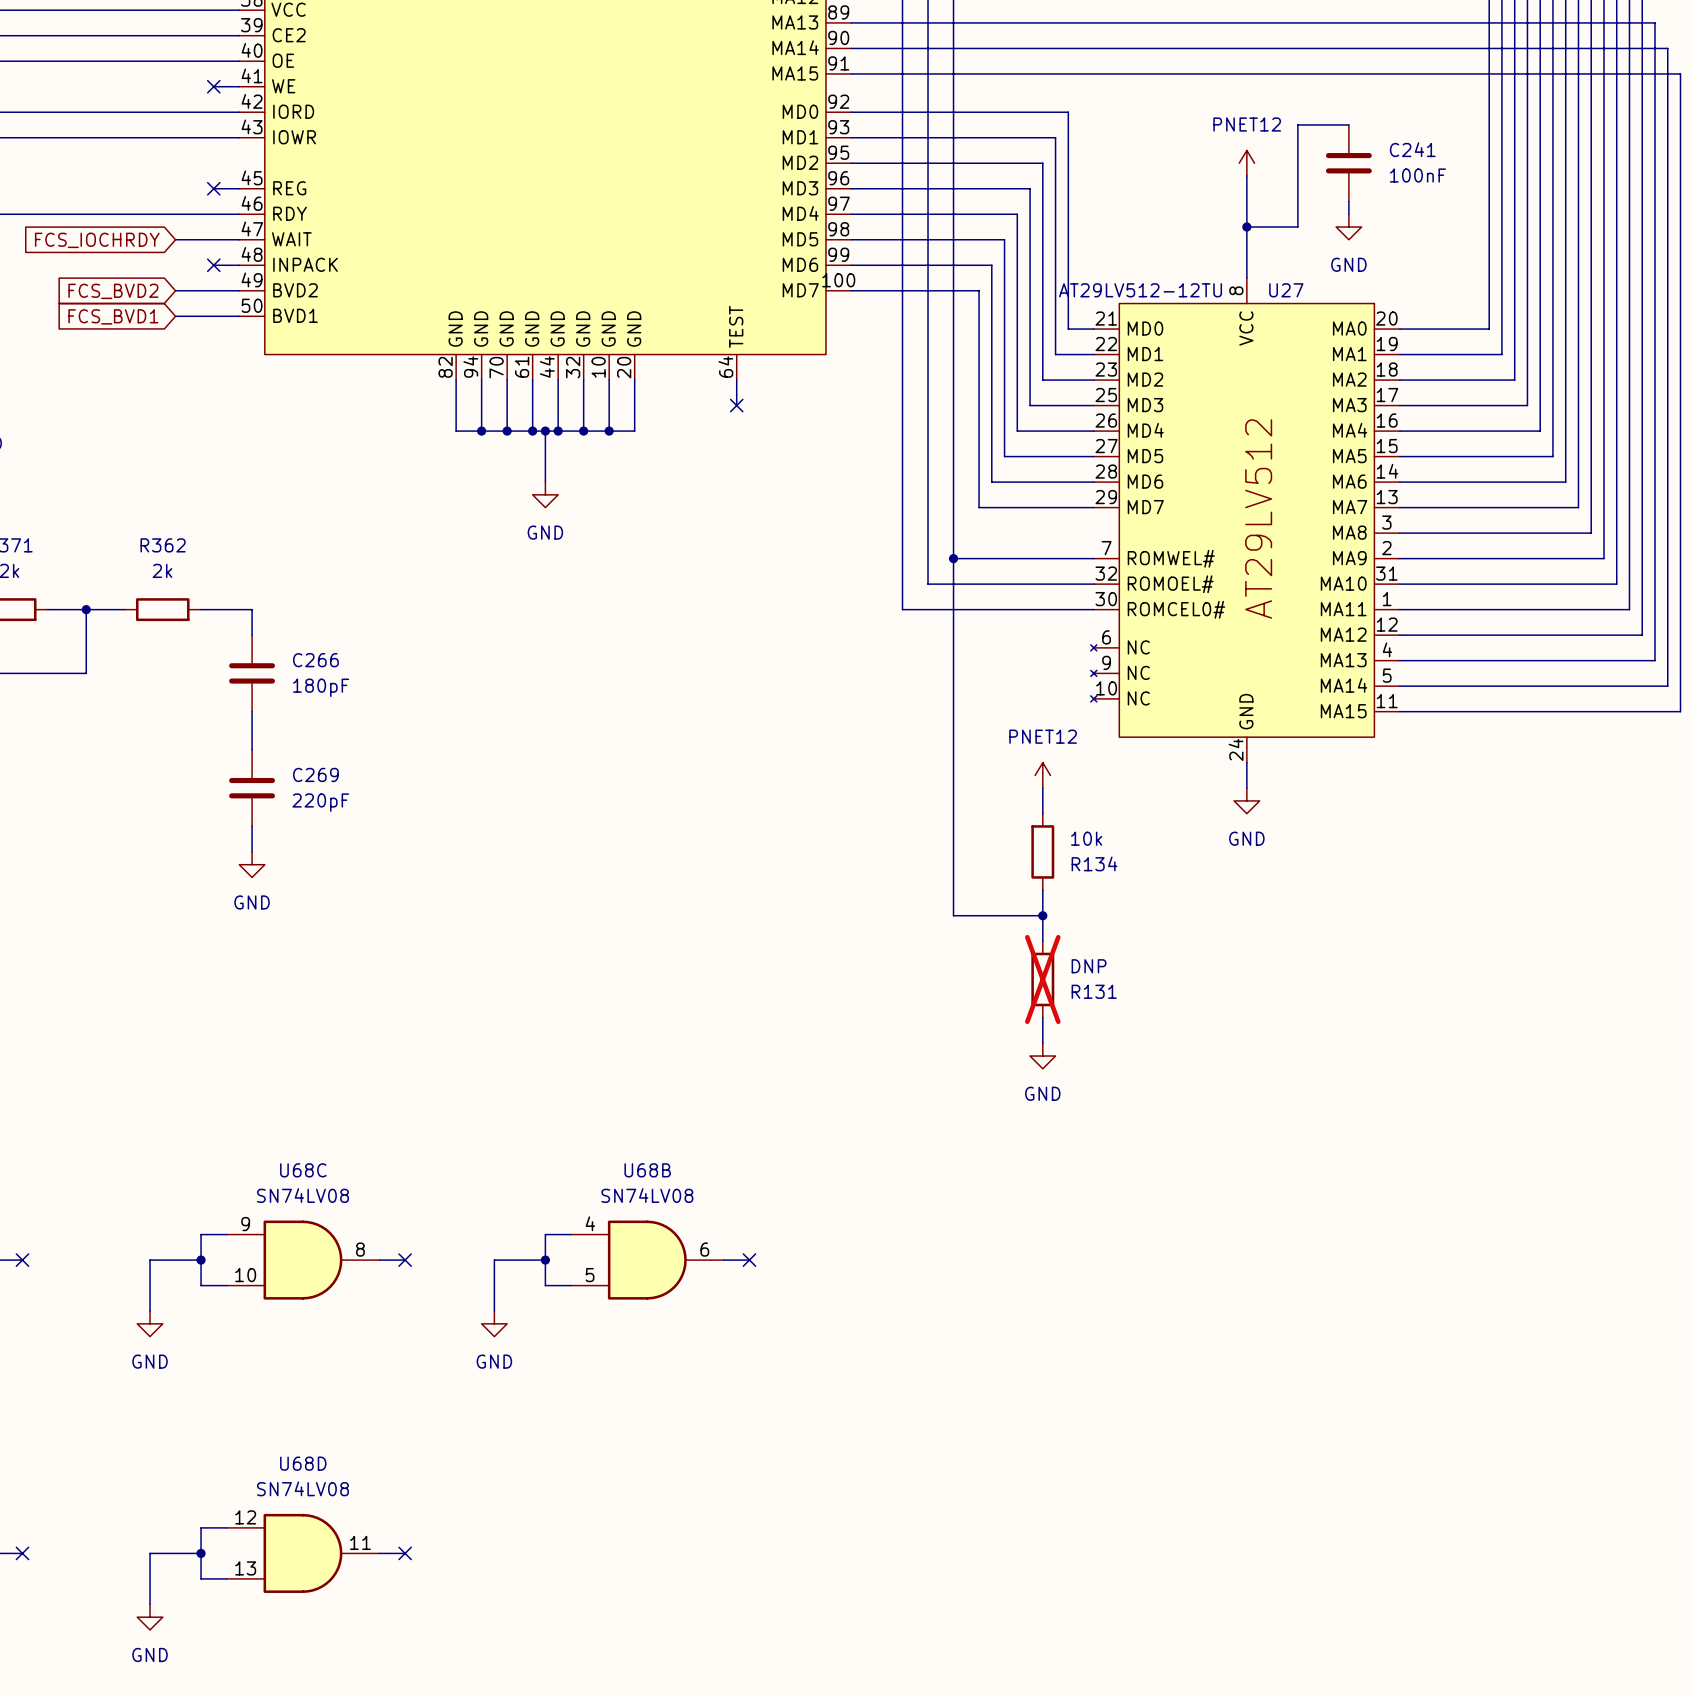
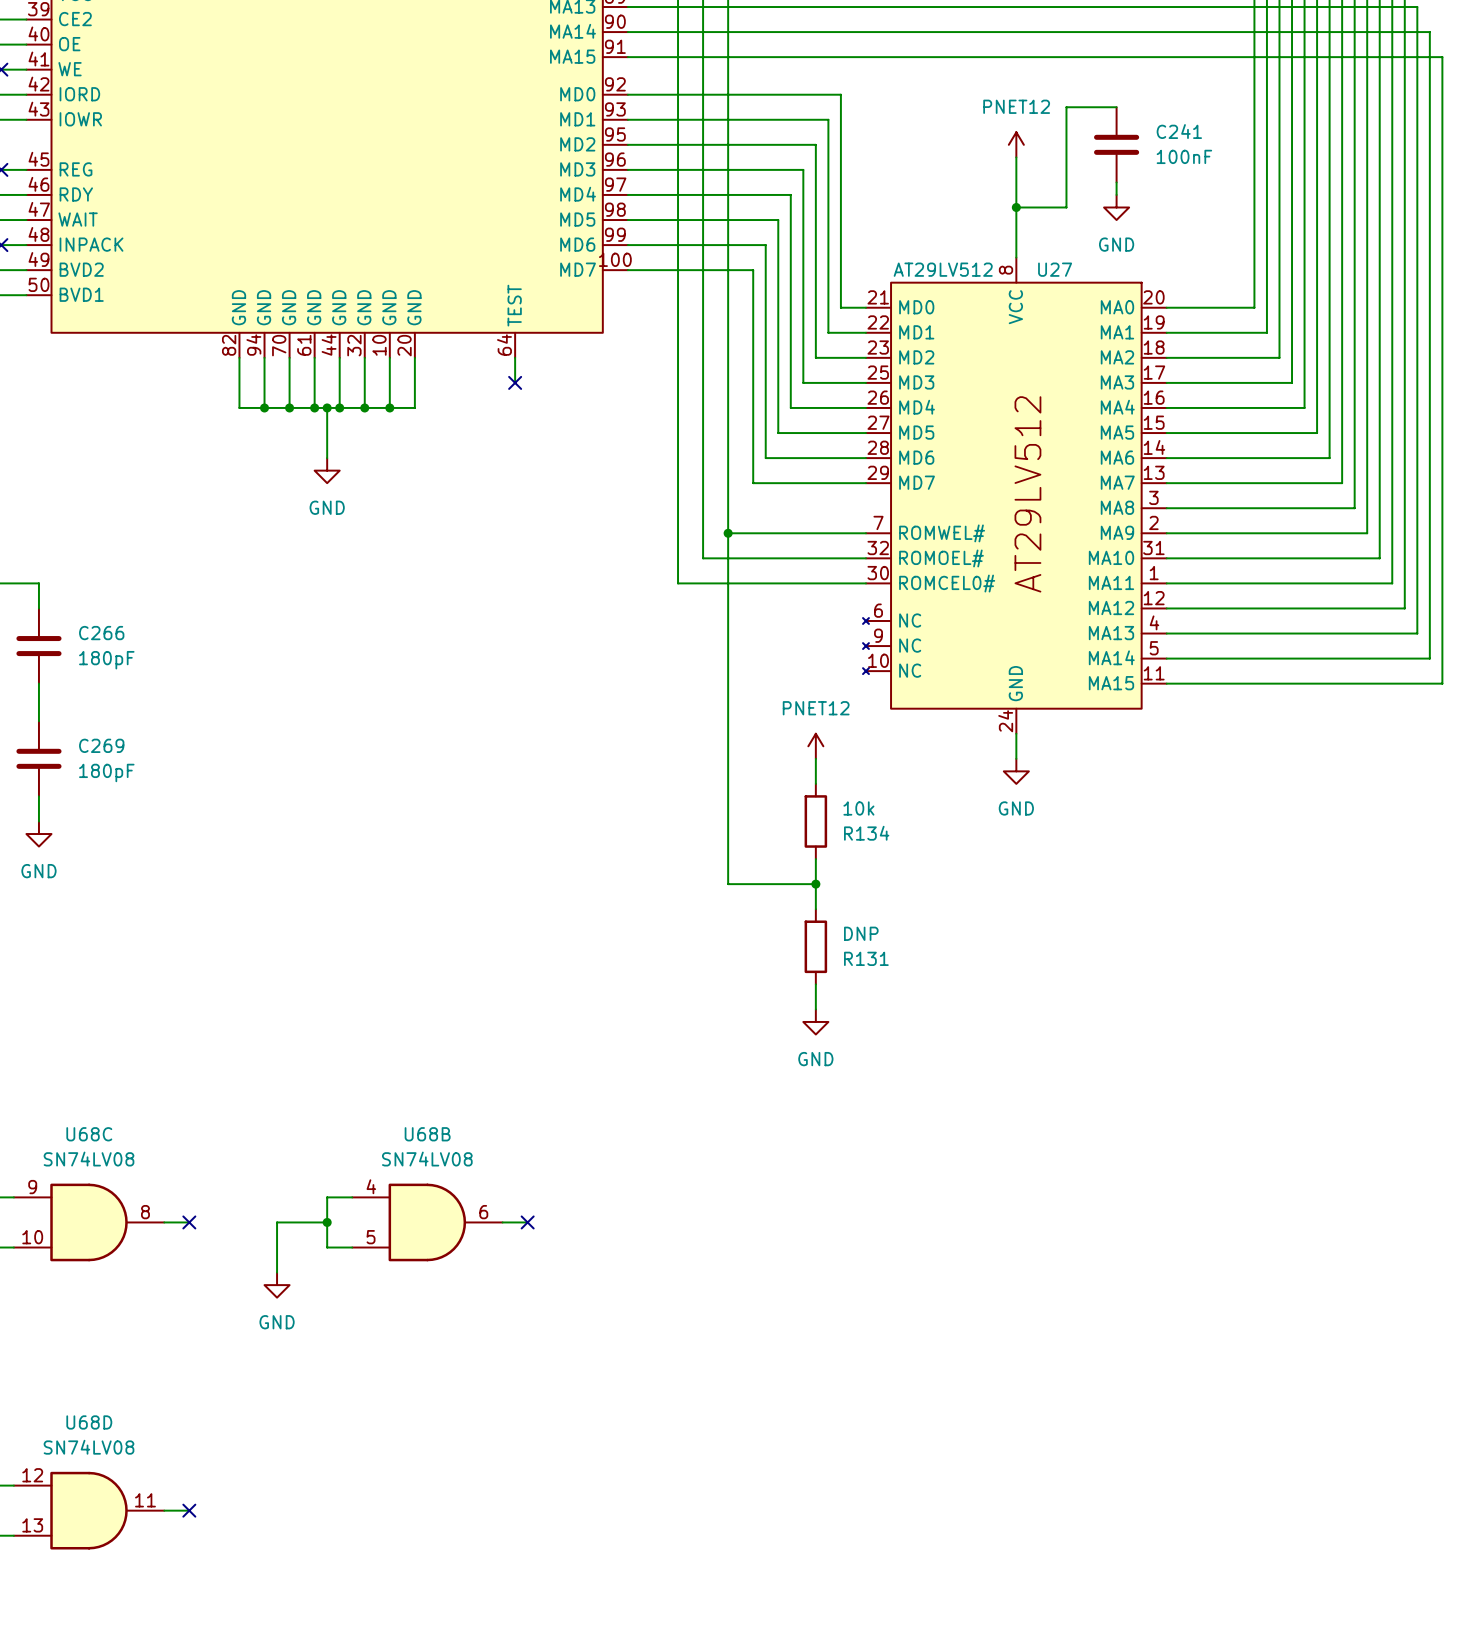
U27 value: AT29LV512-12TU (1140, 290) -> AT29LV512 (943, 269)
C269 value: 220pF (320, 802) -> 180pF (106, 772)
R131 do-not-place cross: (1042, 979) -> none

